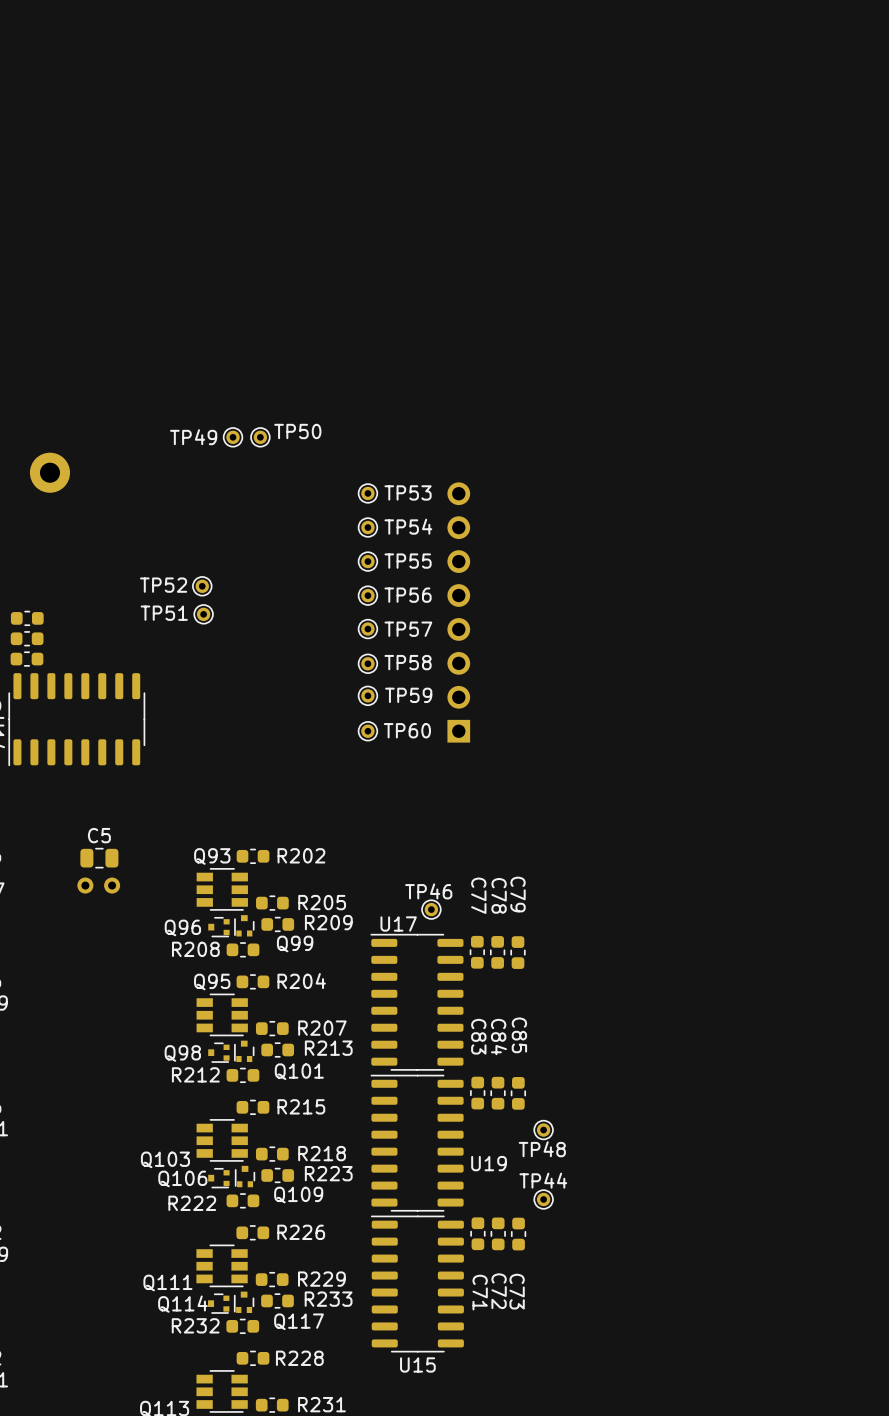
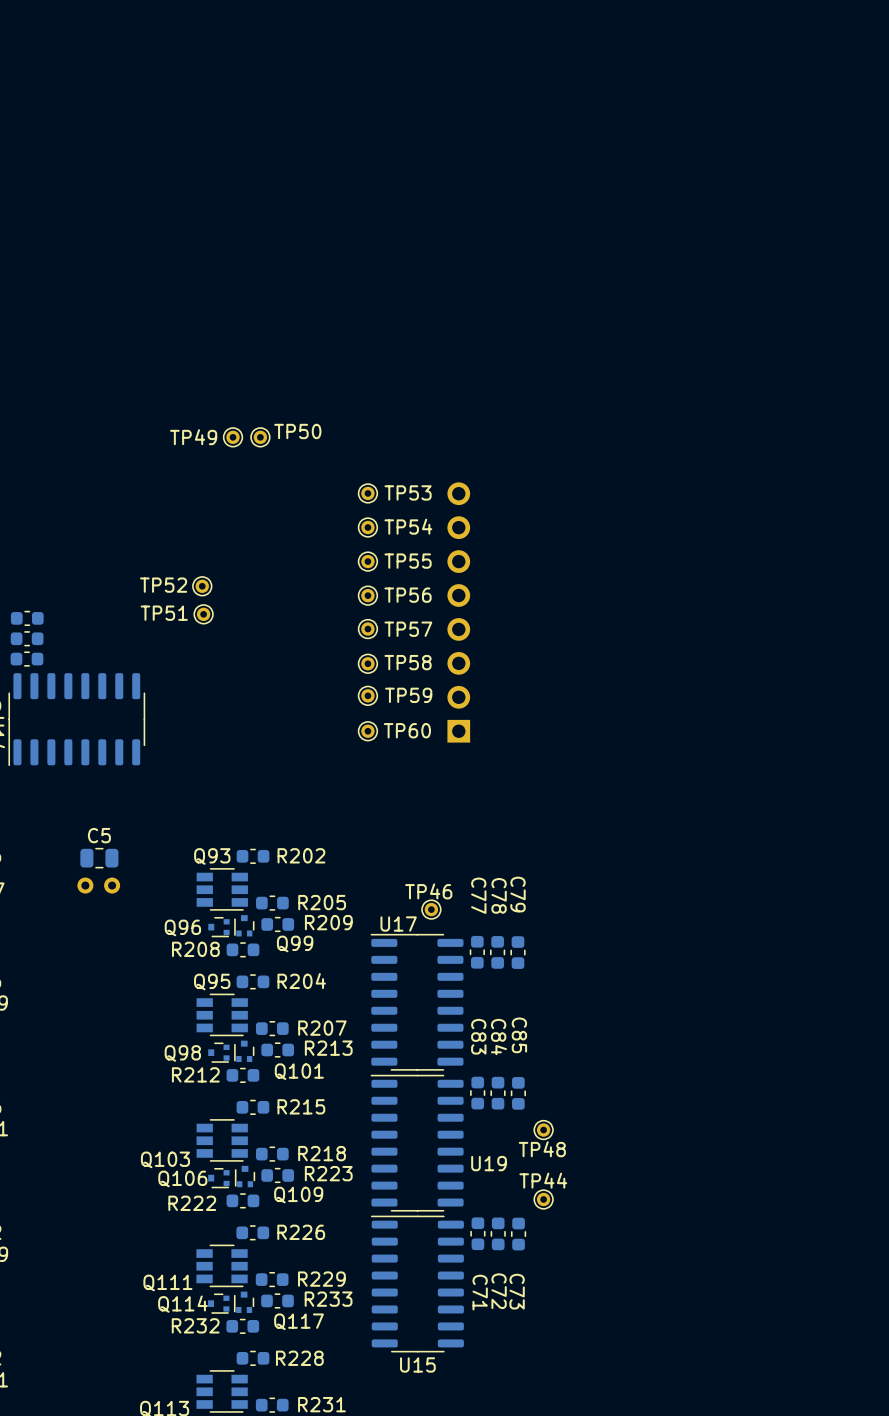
part: (49, 472) -> none

